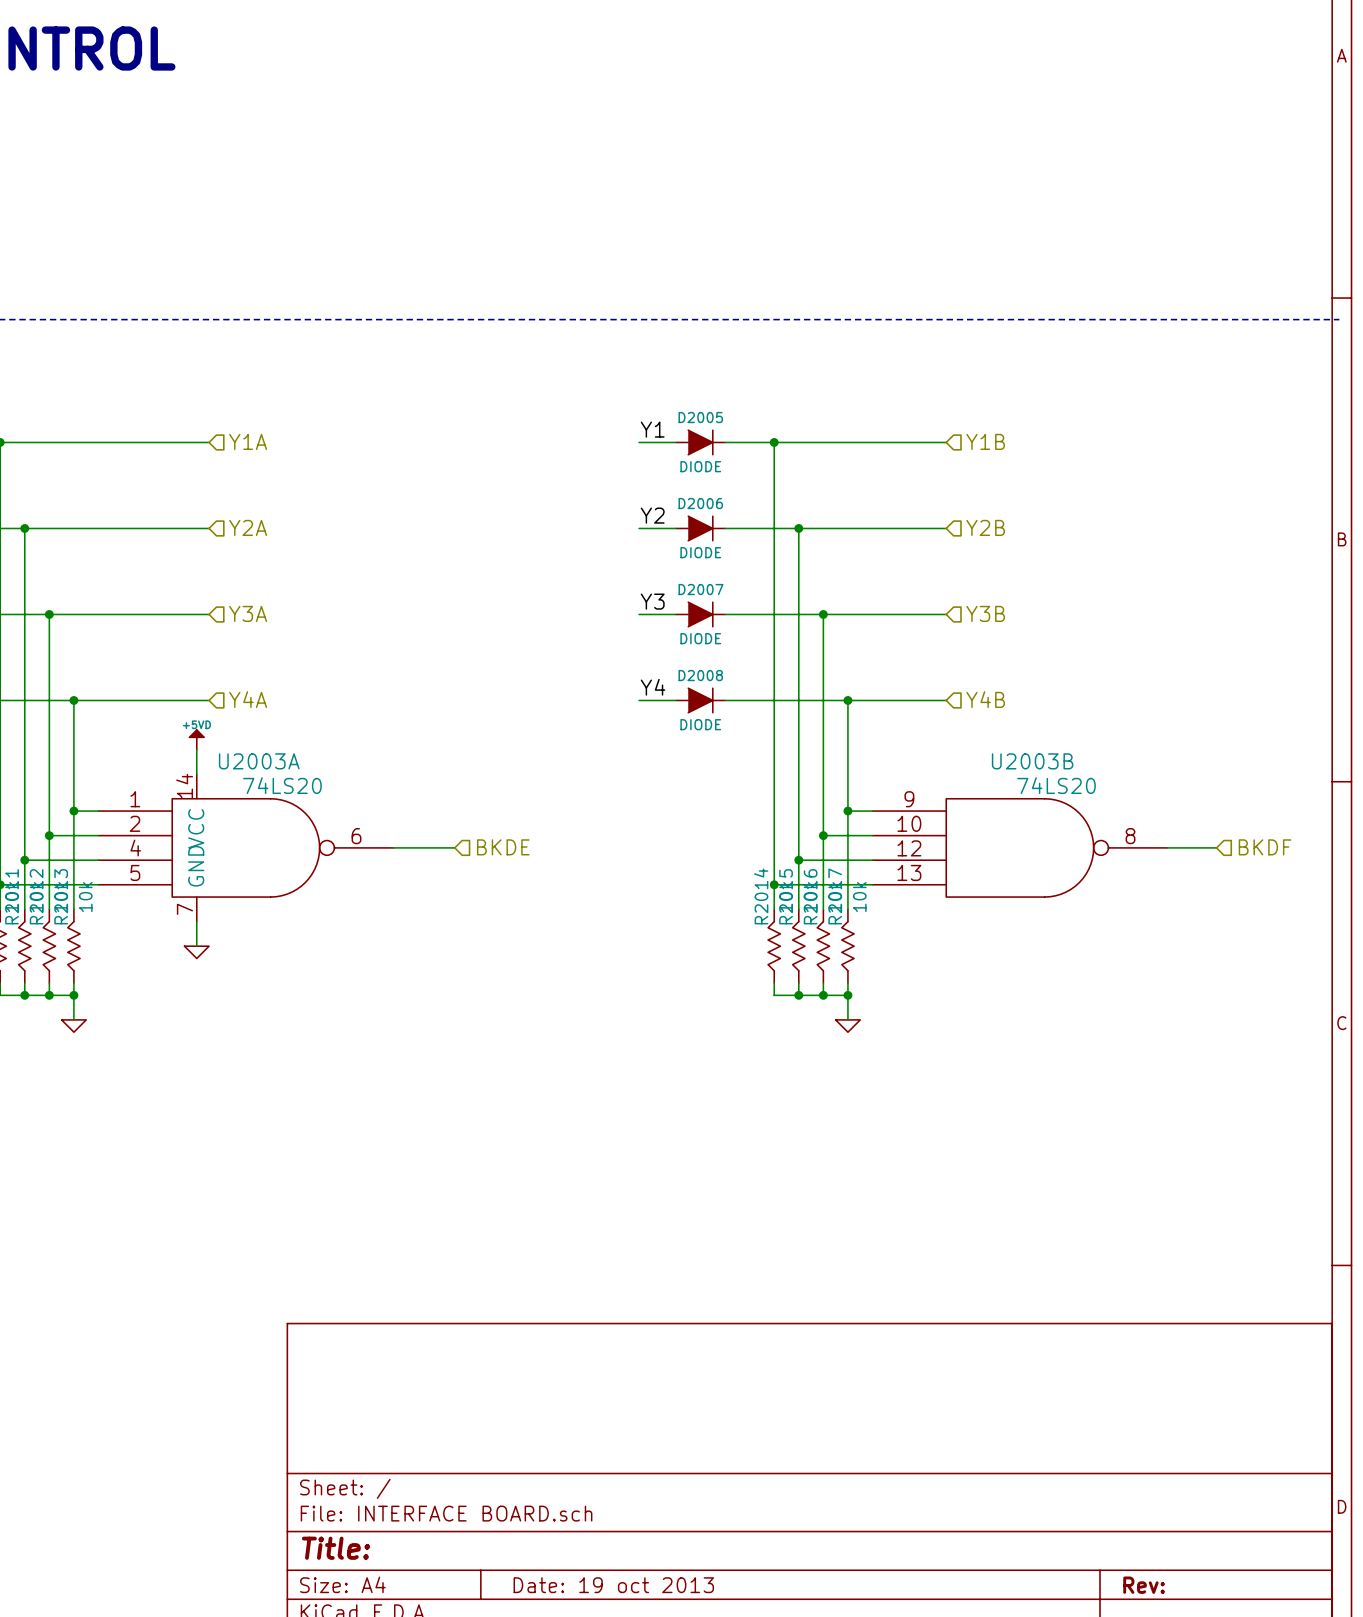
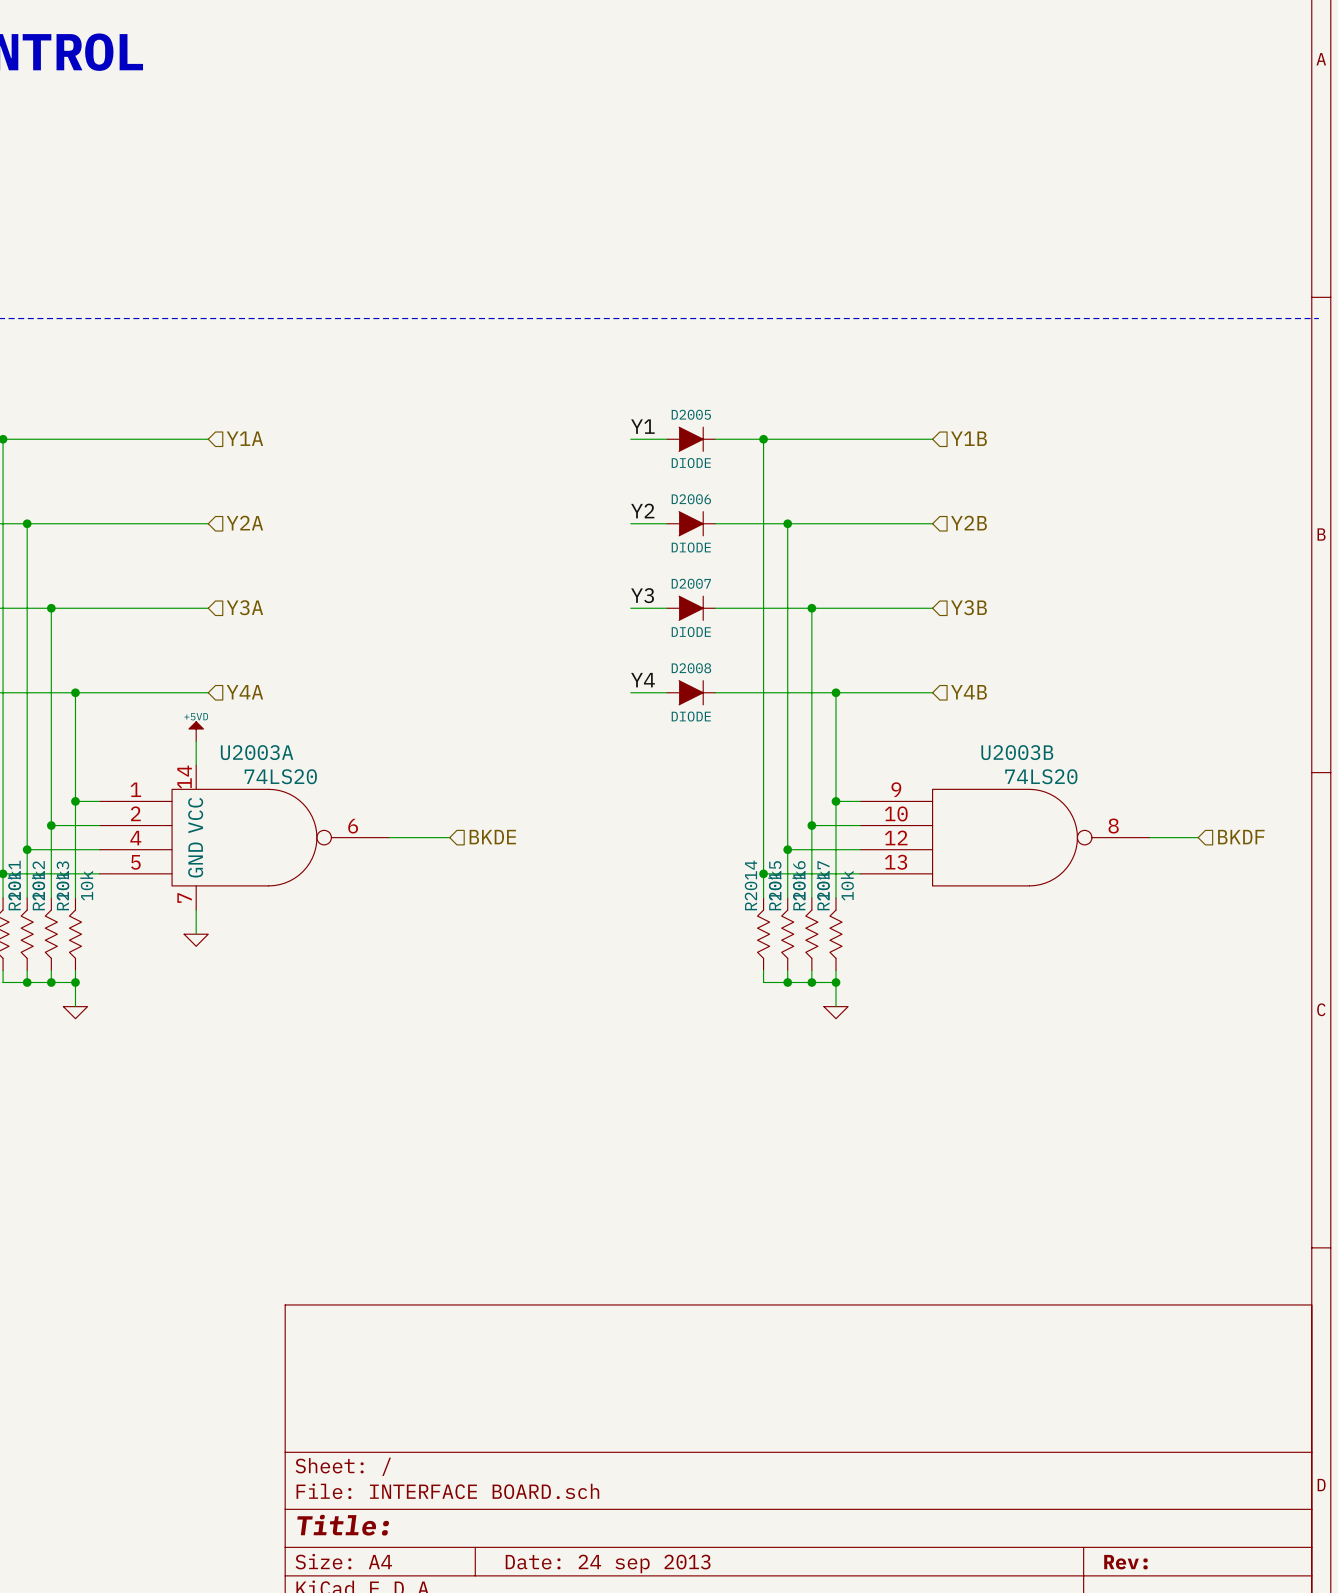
title block: Date: 19 oct 2013 (613, 1585) -> Date: 24 sep 2013 (608, 1563)

